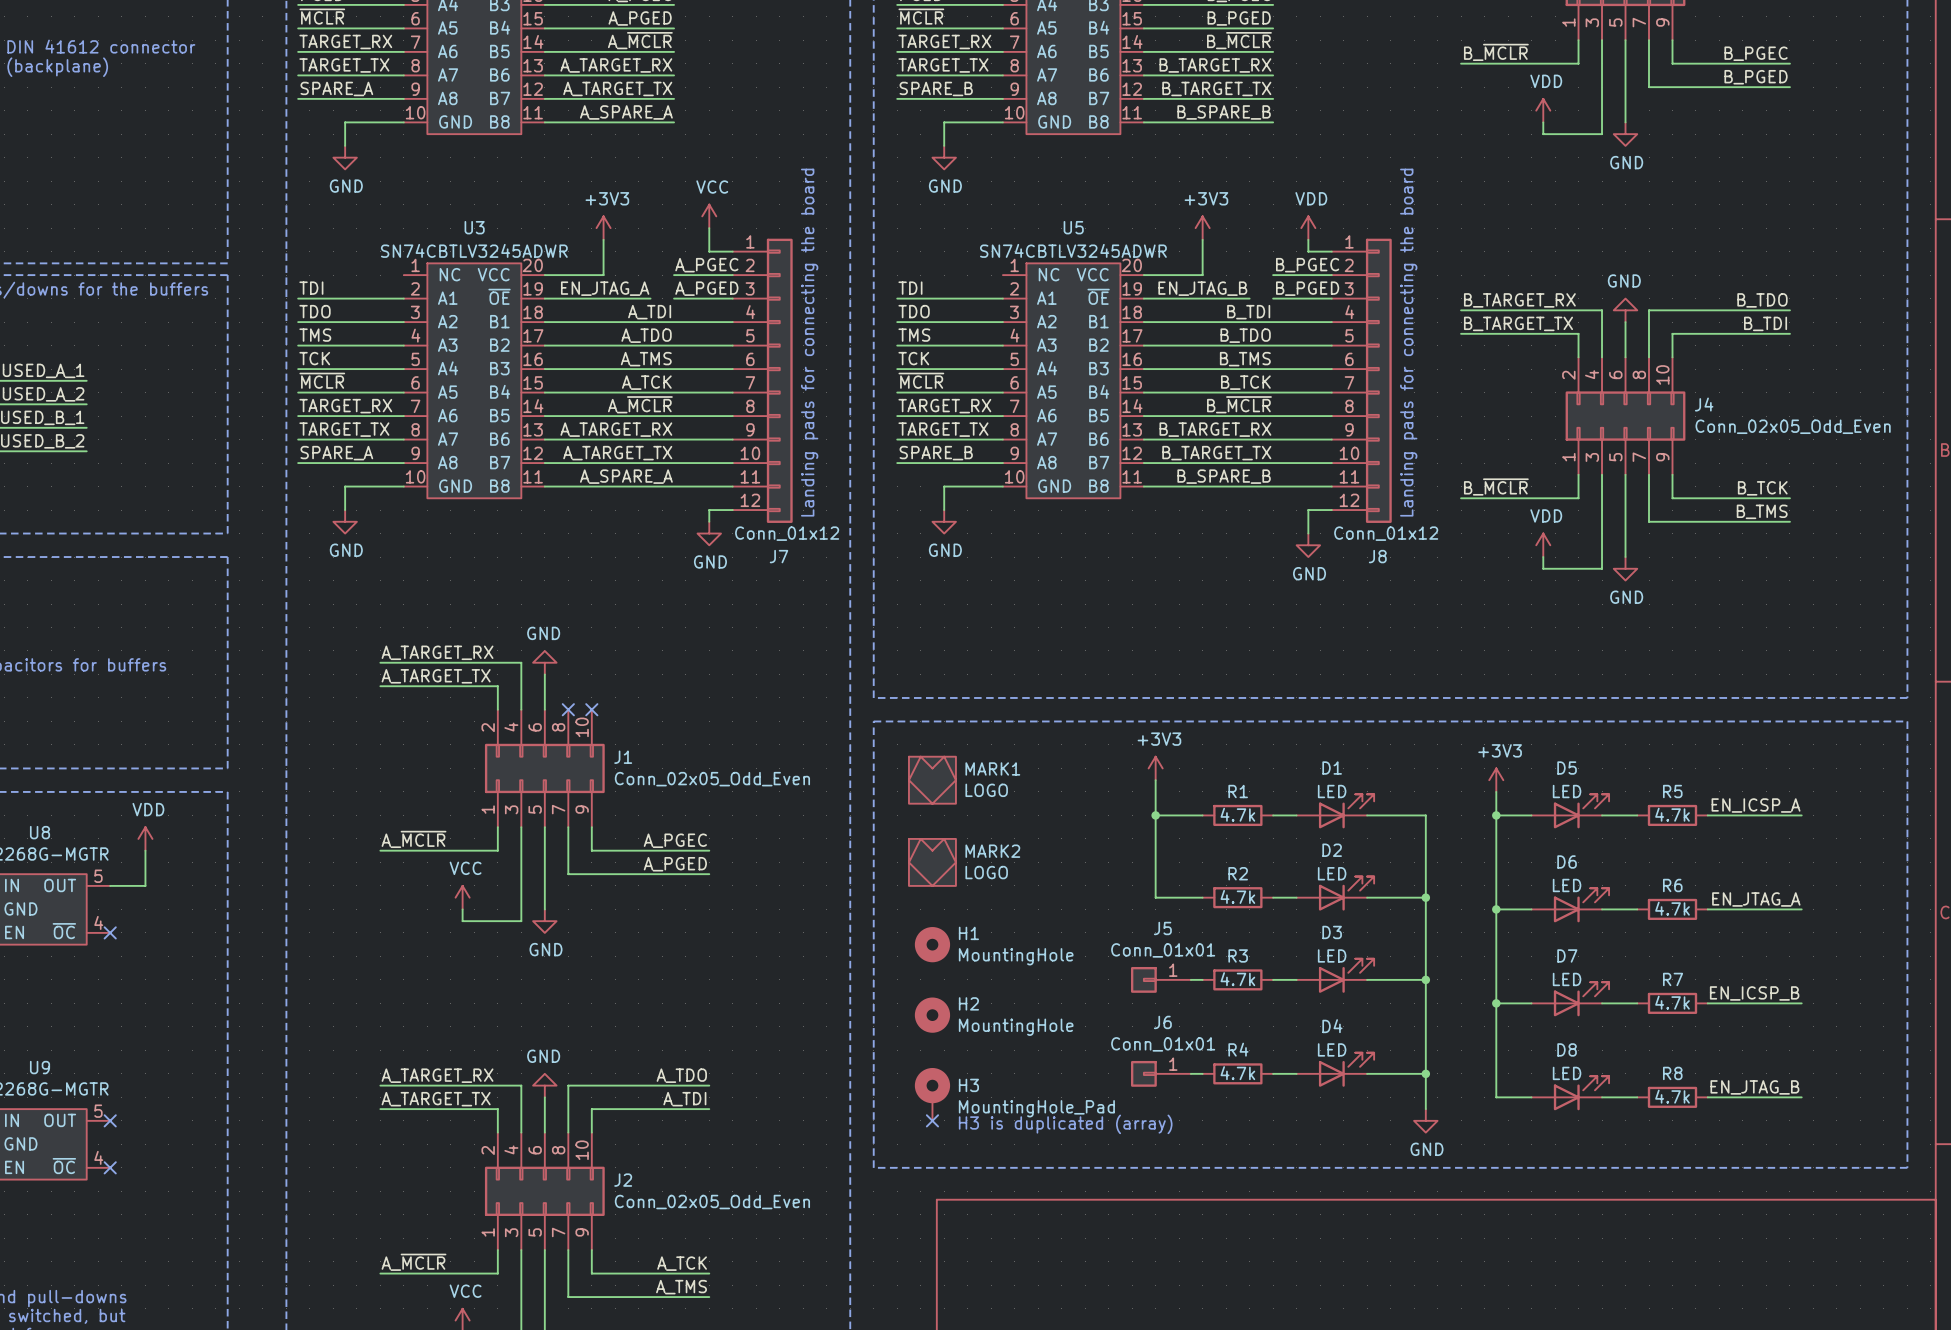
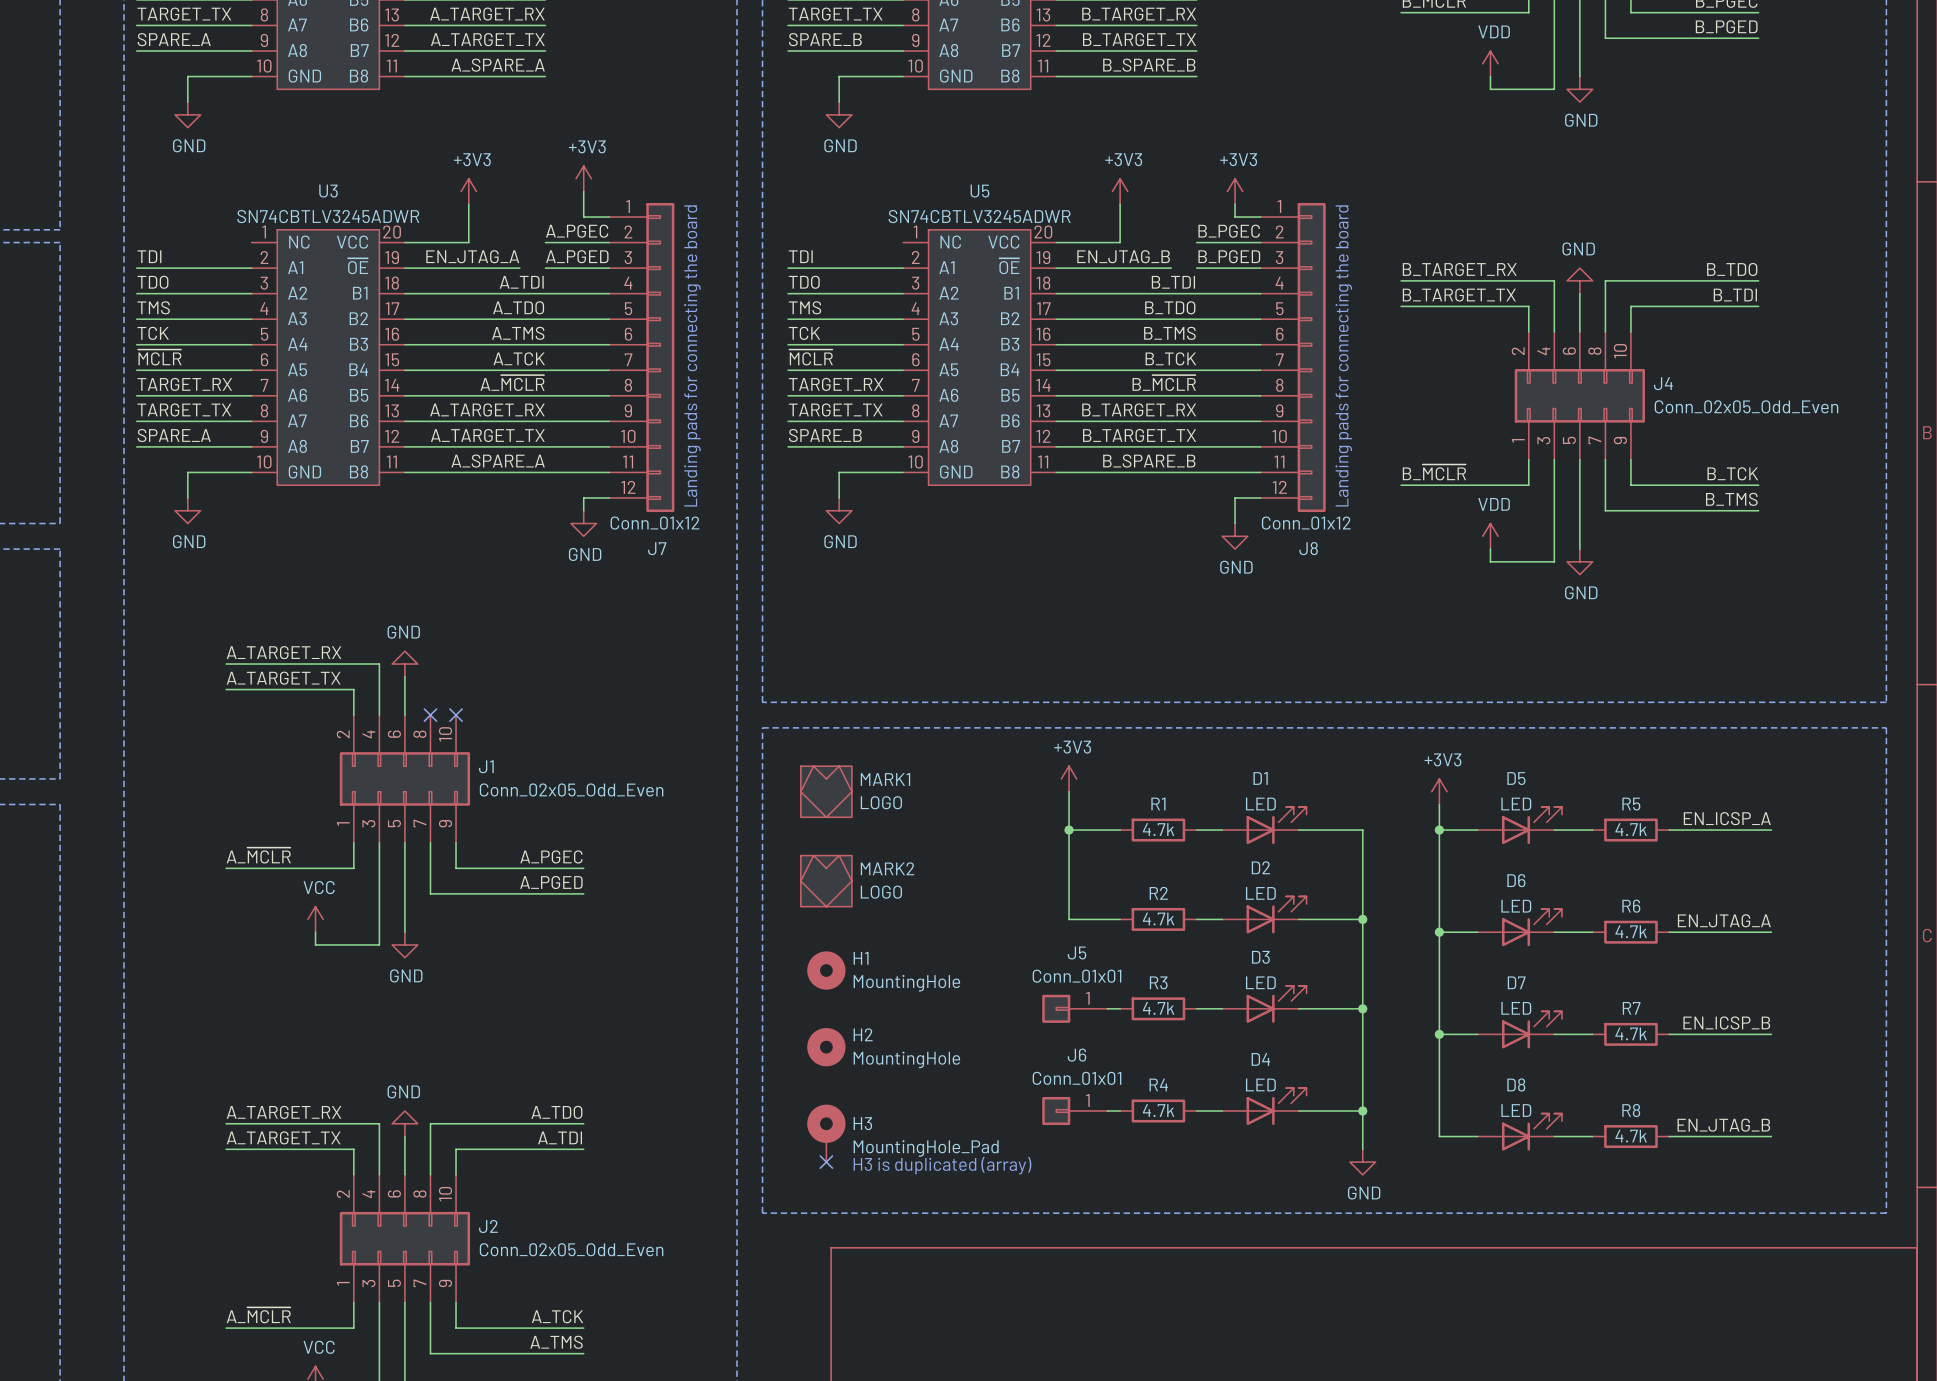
power symbol: VCC (709, 216) -> +3V3 (583, 178)
power symbol: VDD (1308, 228) -> +3V3 (1235, 191)

